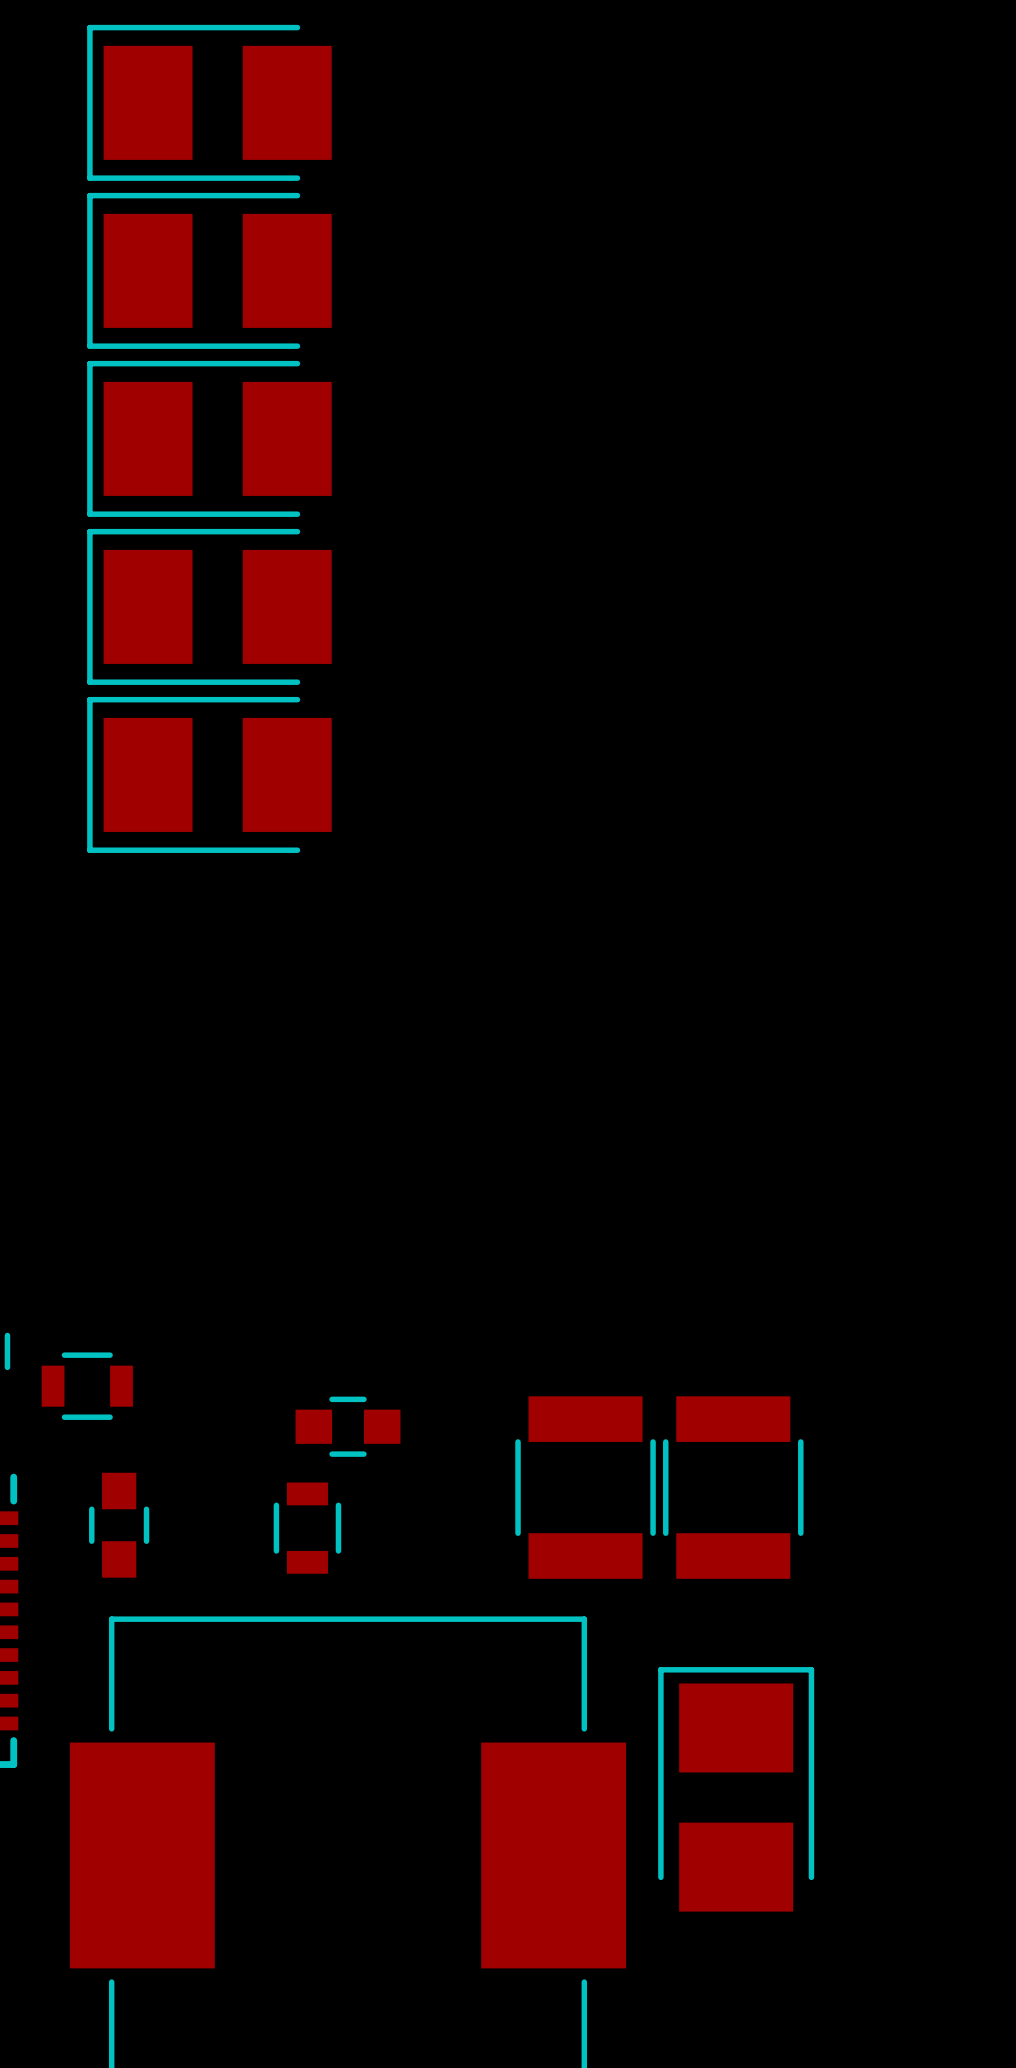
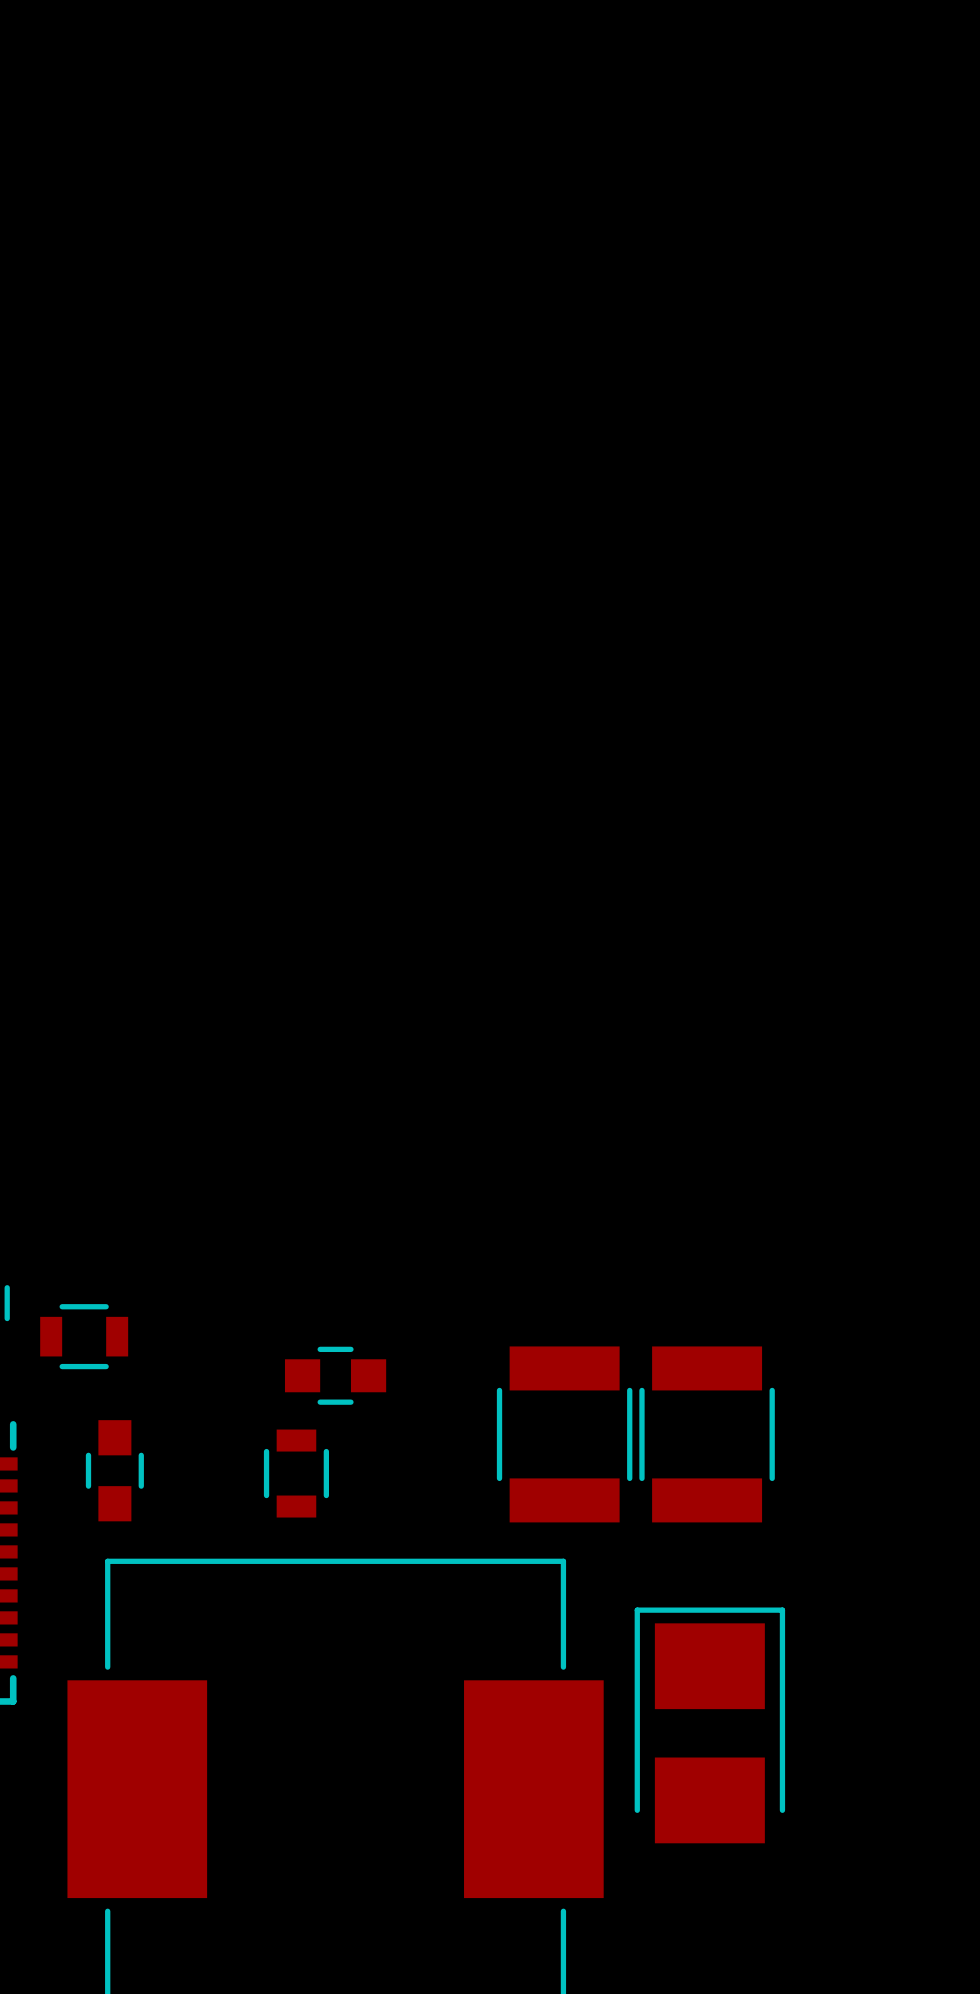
part: (209, 102) -> none
part: (209, 270) -> none
part: (209, 438) -> none
part: (209, 606) -> none
part: (209, 774) -> none

